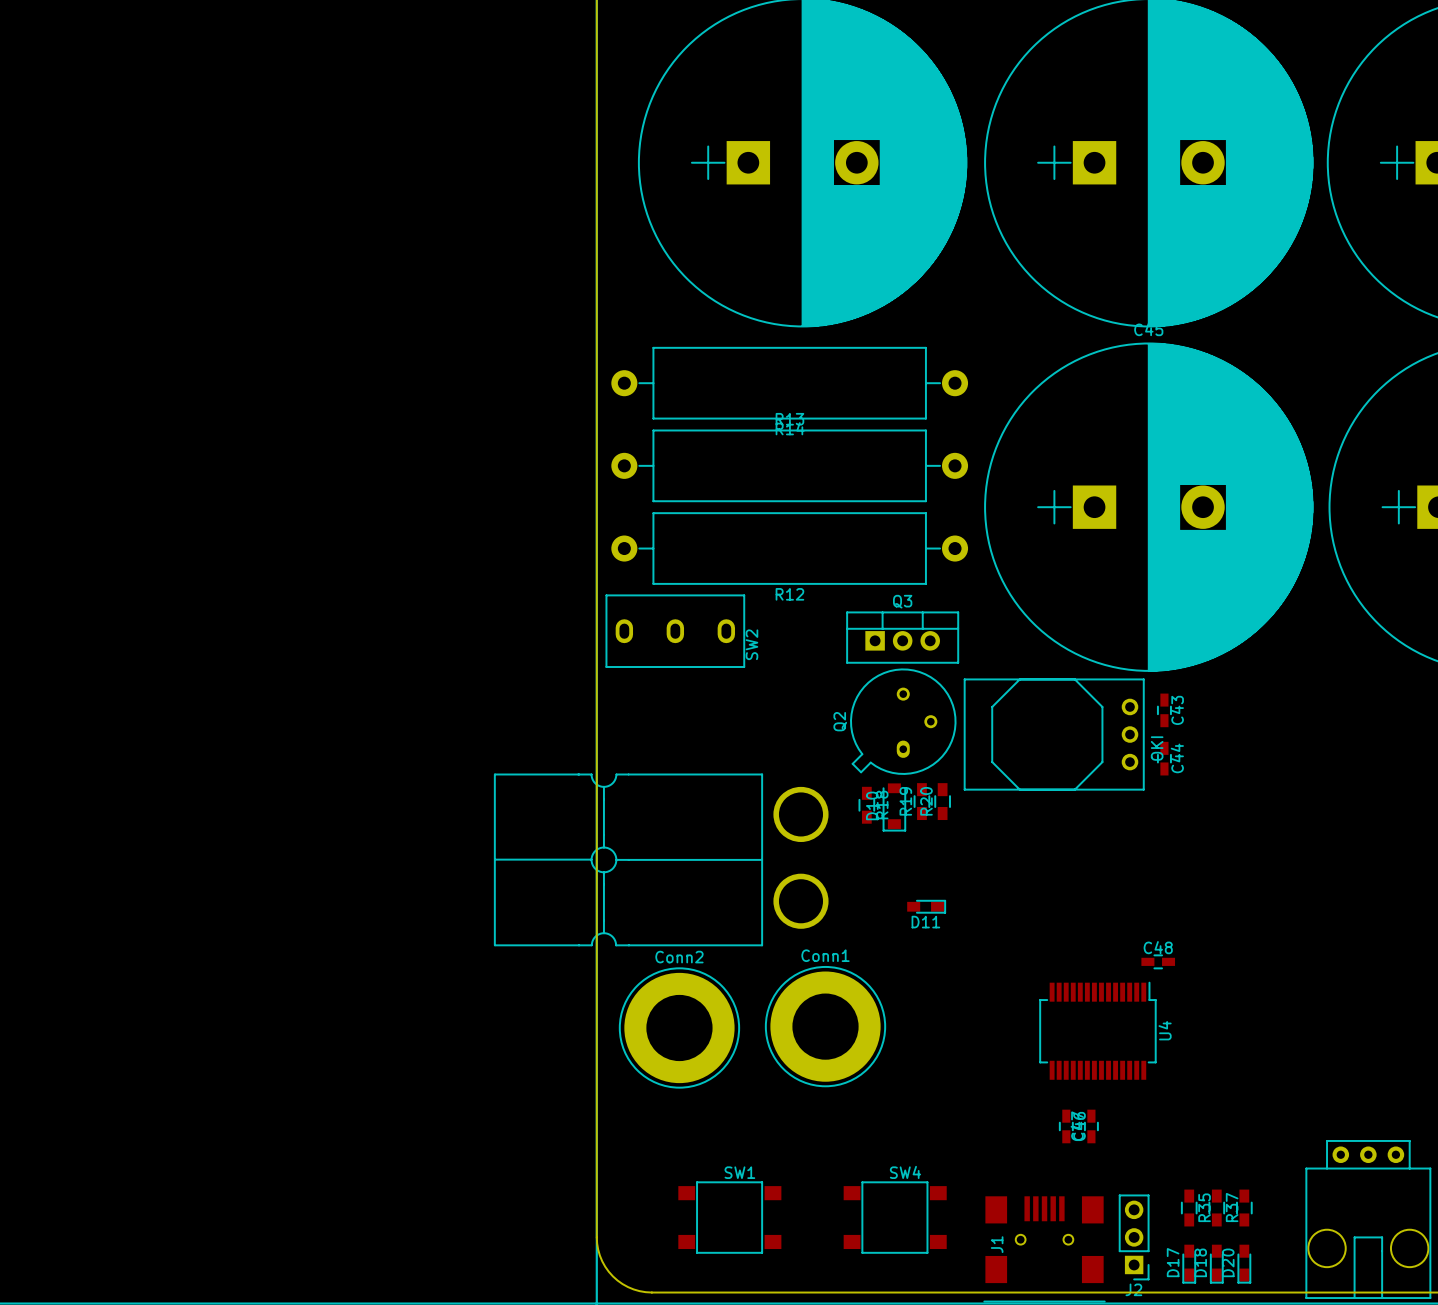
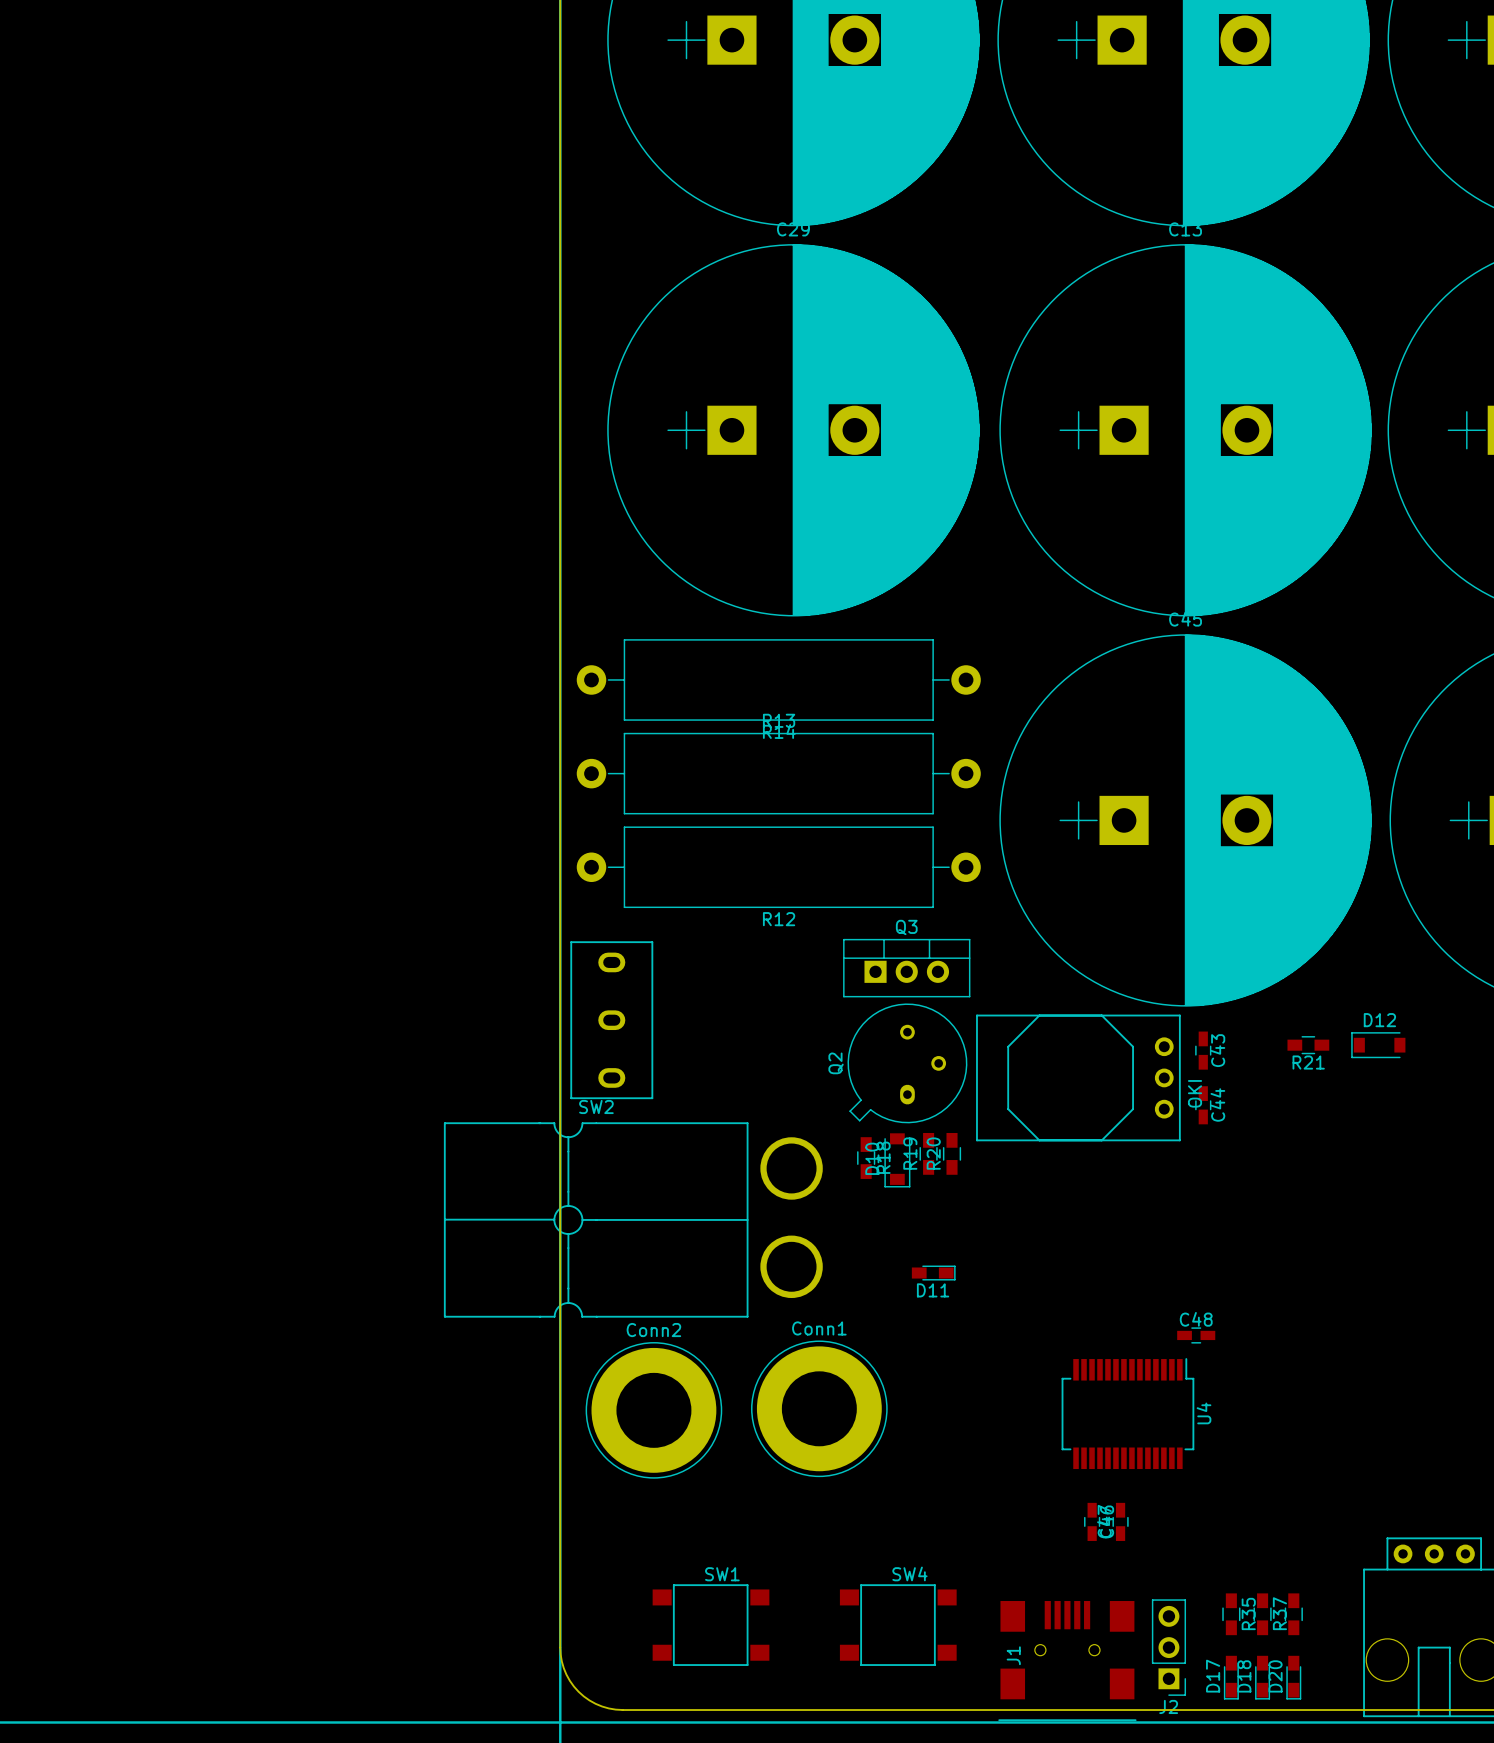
SW2 rotation: 0° (675, 631) -> 90° clockwise (611, 1020)
R21: none -> (1308, 1045)
D12: none -> (1378, 1045)

